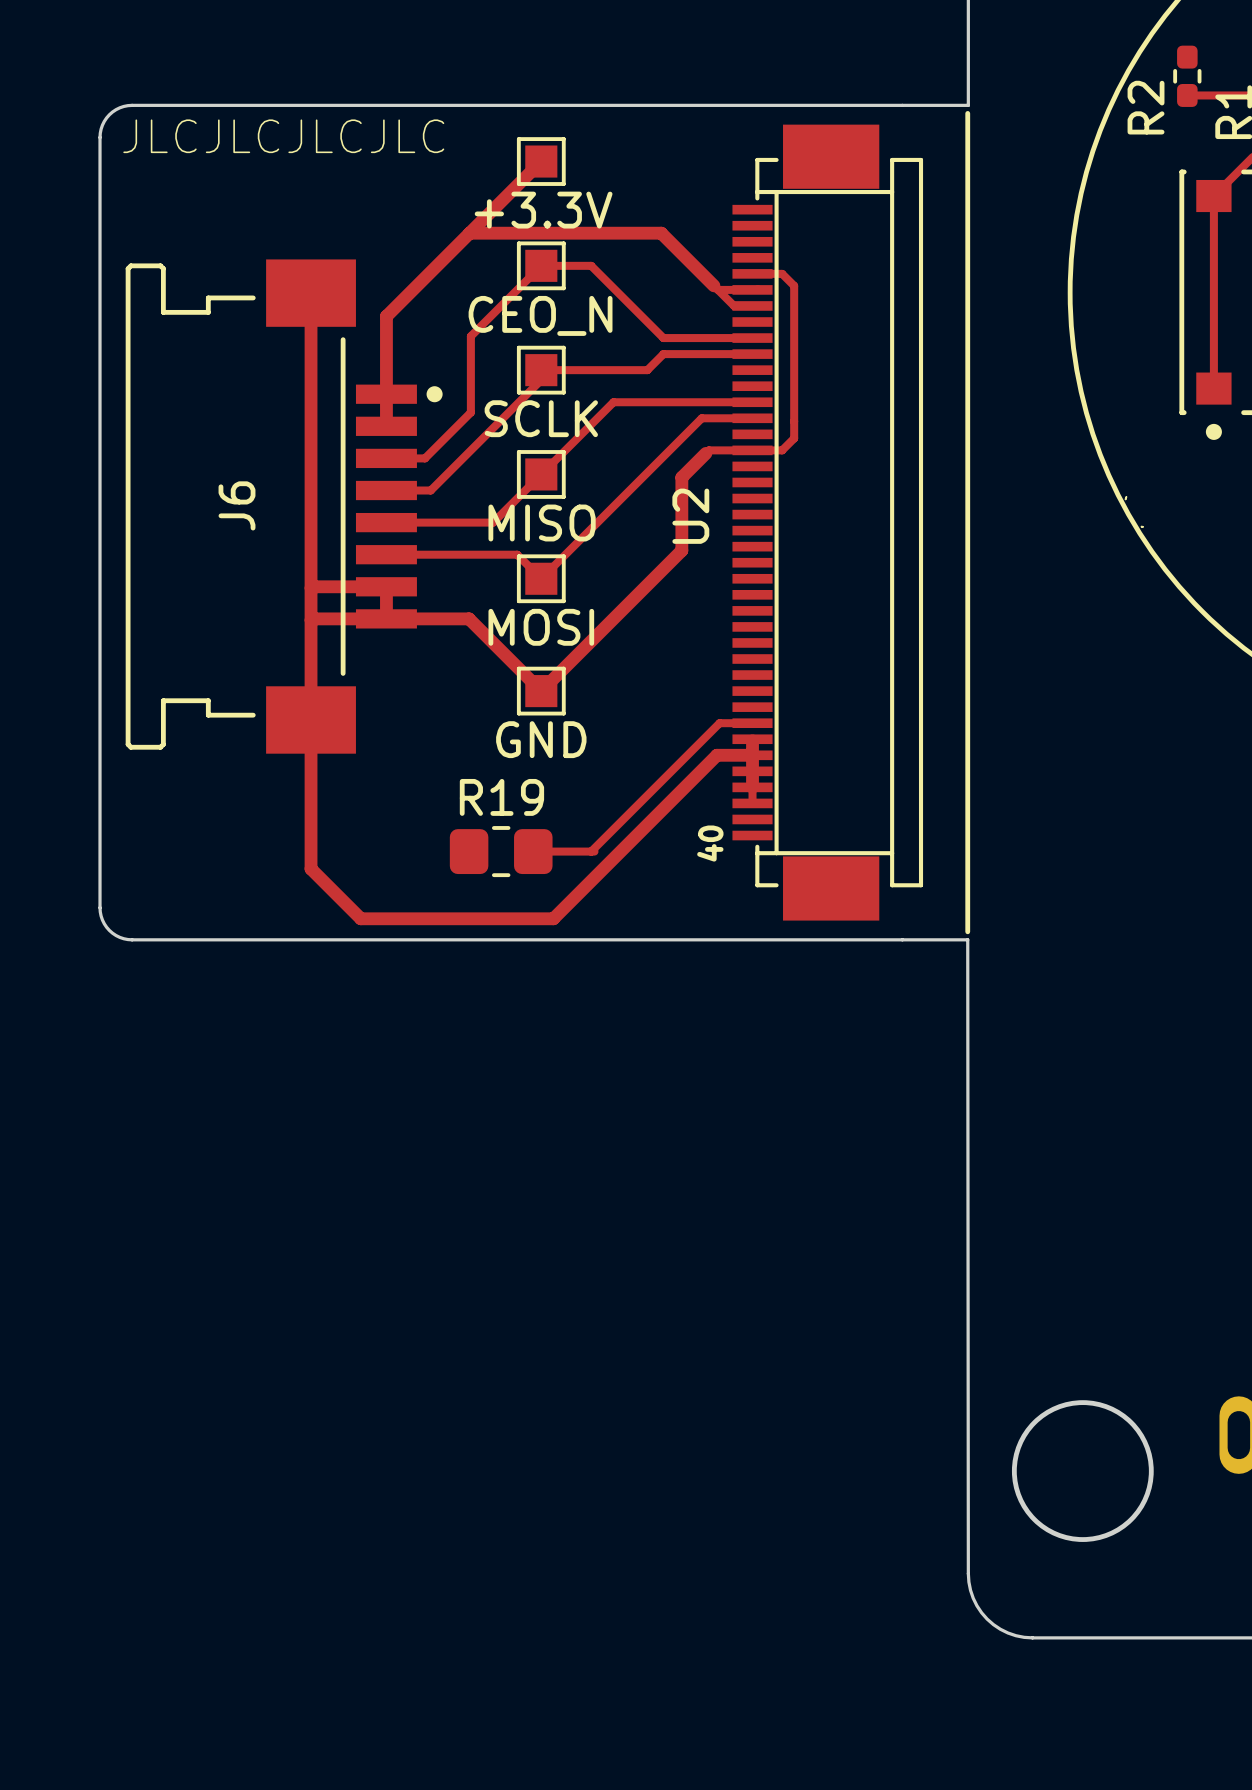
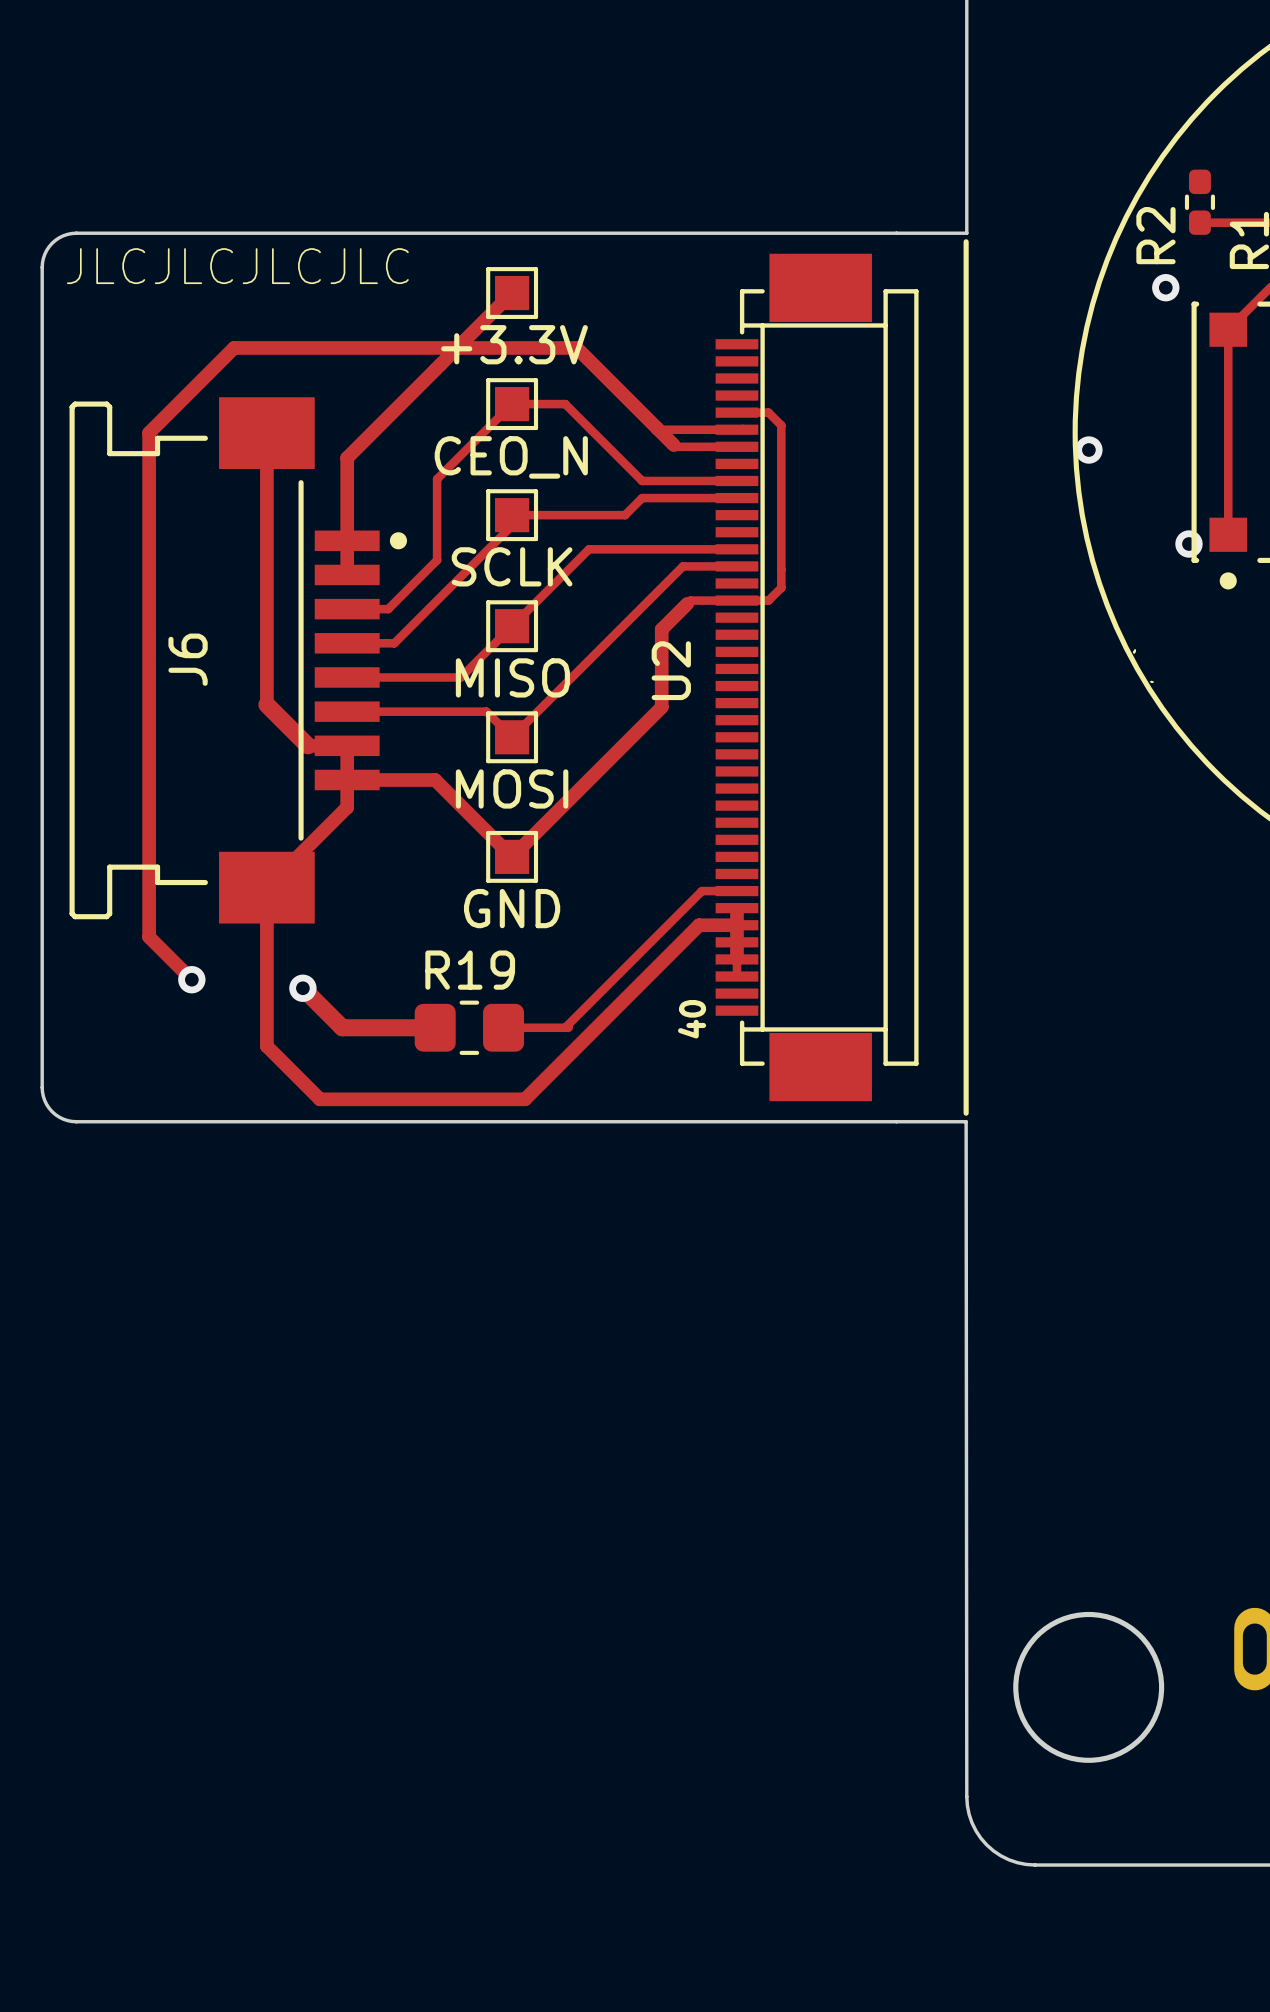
via: none -> (1165, 287)
track: (469, 233) (661, 233) (734, 305) -> (191, 979) (149, 936) (149, 432) (234, 347) (576, 347) (675, 446) (717, 446)
track: none -> (657, 428) (700, 429)
via: none -> (1088, 450)
via: none -> (1188, 544)
track: (311, 548) (311, 719) -> none
track: (349, 586) (311, 588) -> (307, 745) (266, 704)
track: (386, 618) (311, 620) -> (347, 780) (347, 807) (266, 887)
via: none -> (191, 979)
track: none -> (302, 988) (342, 1027) (435, 1027)
via: none -> (302, 988)

